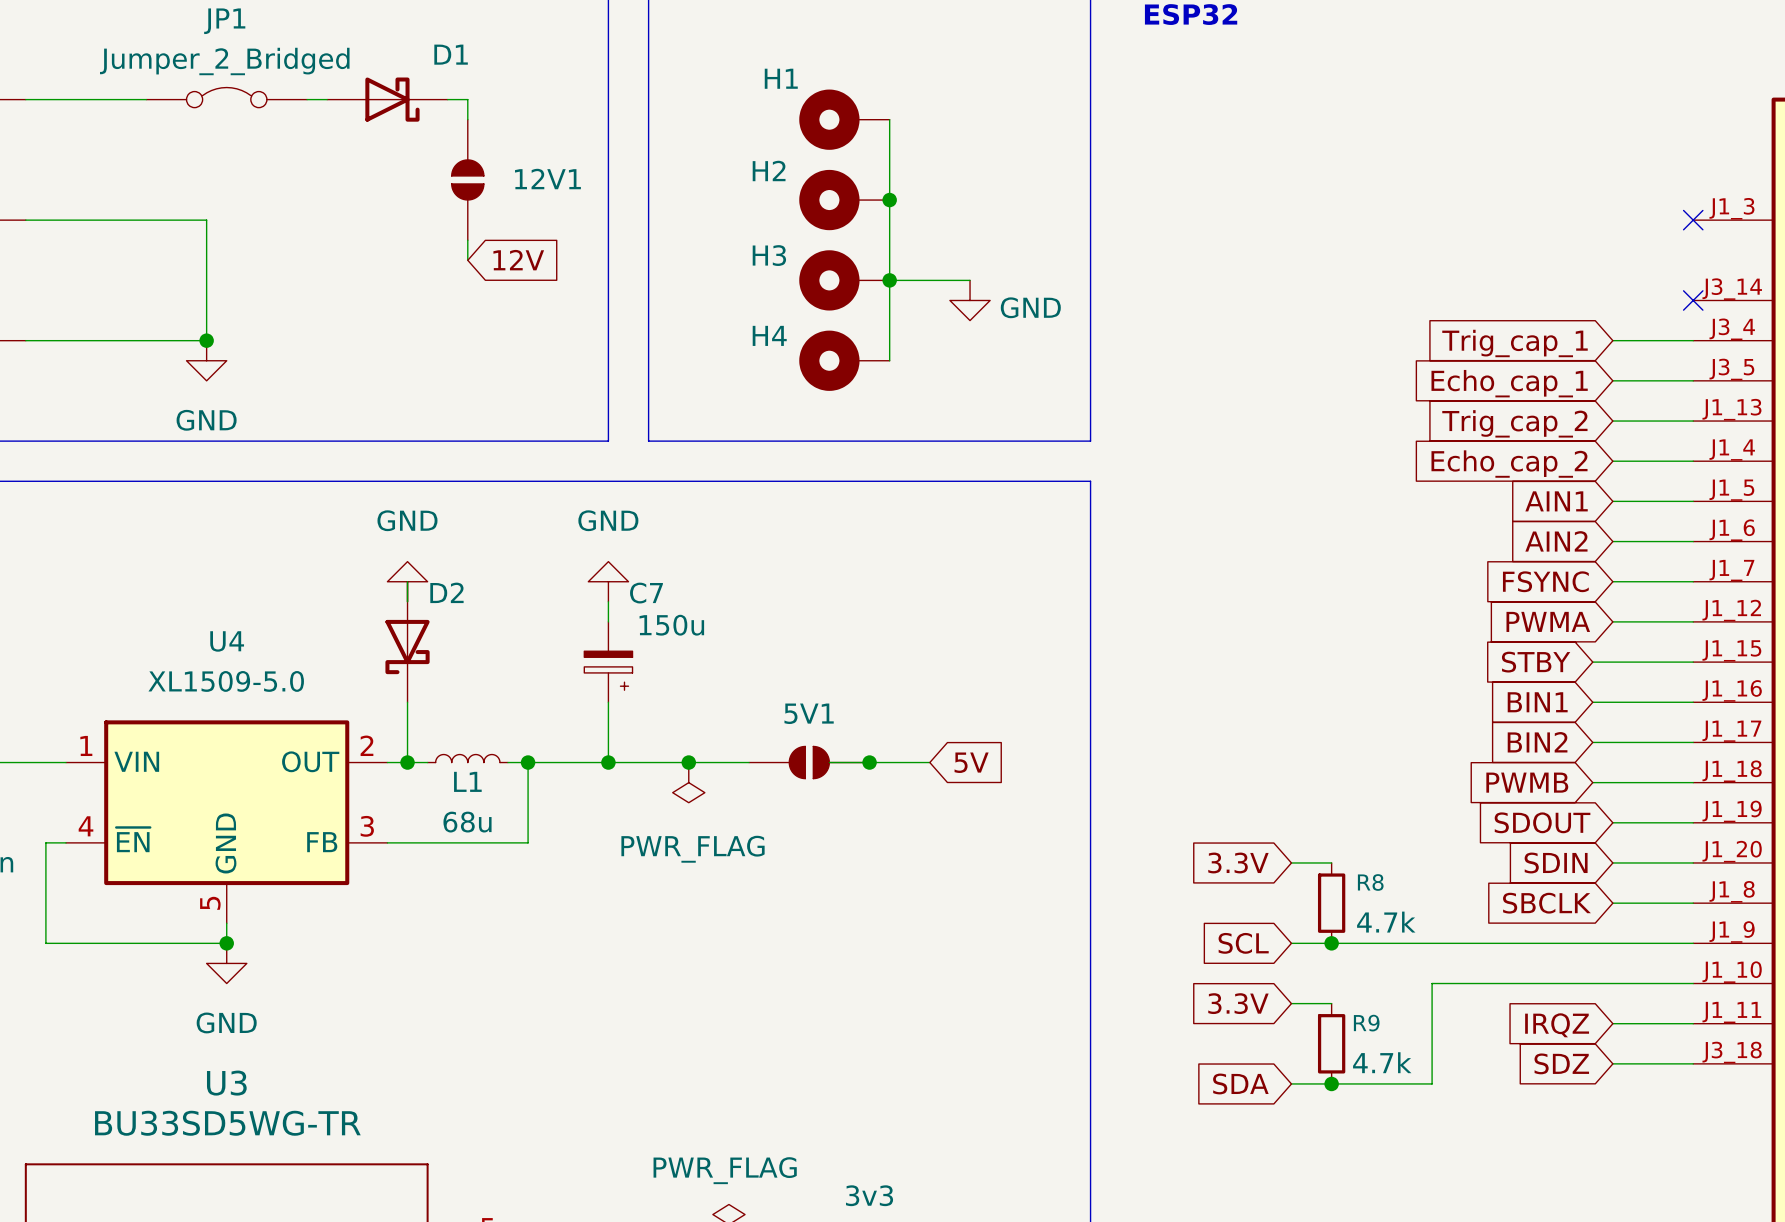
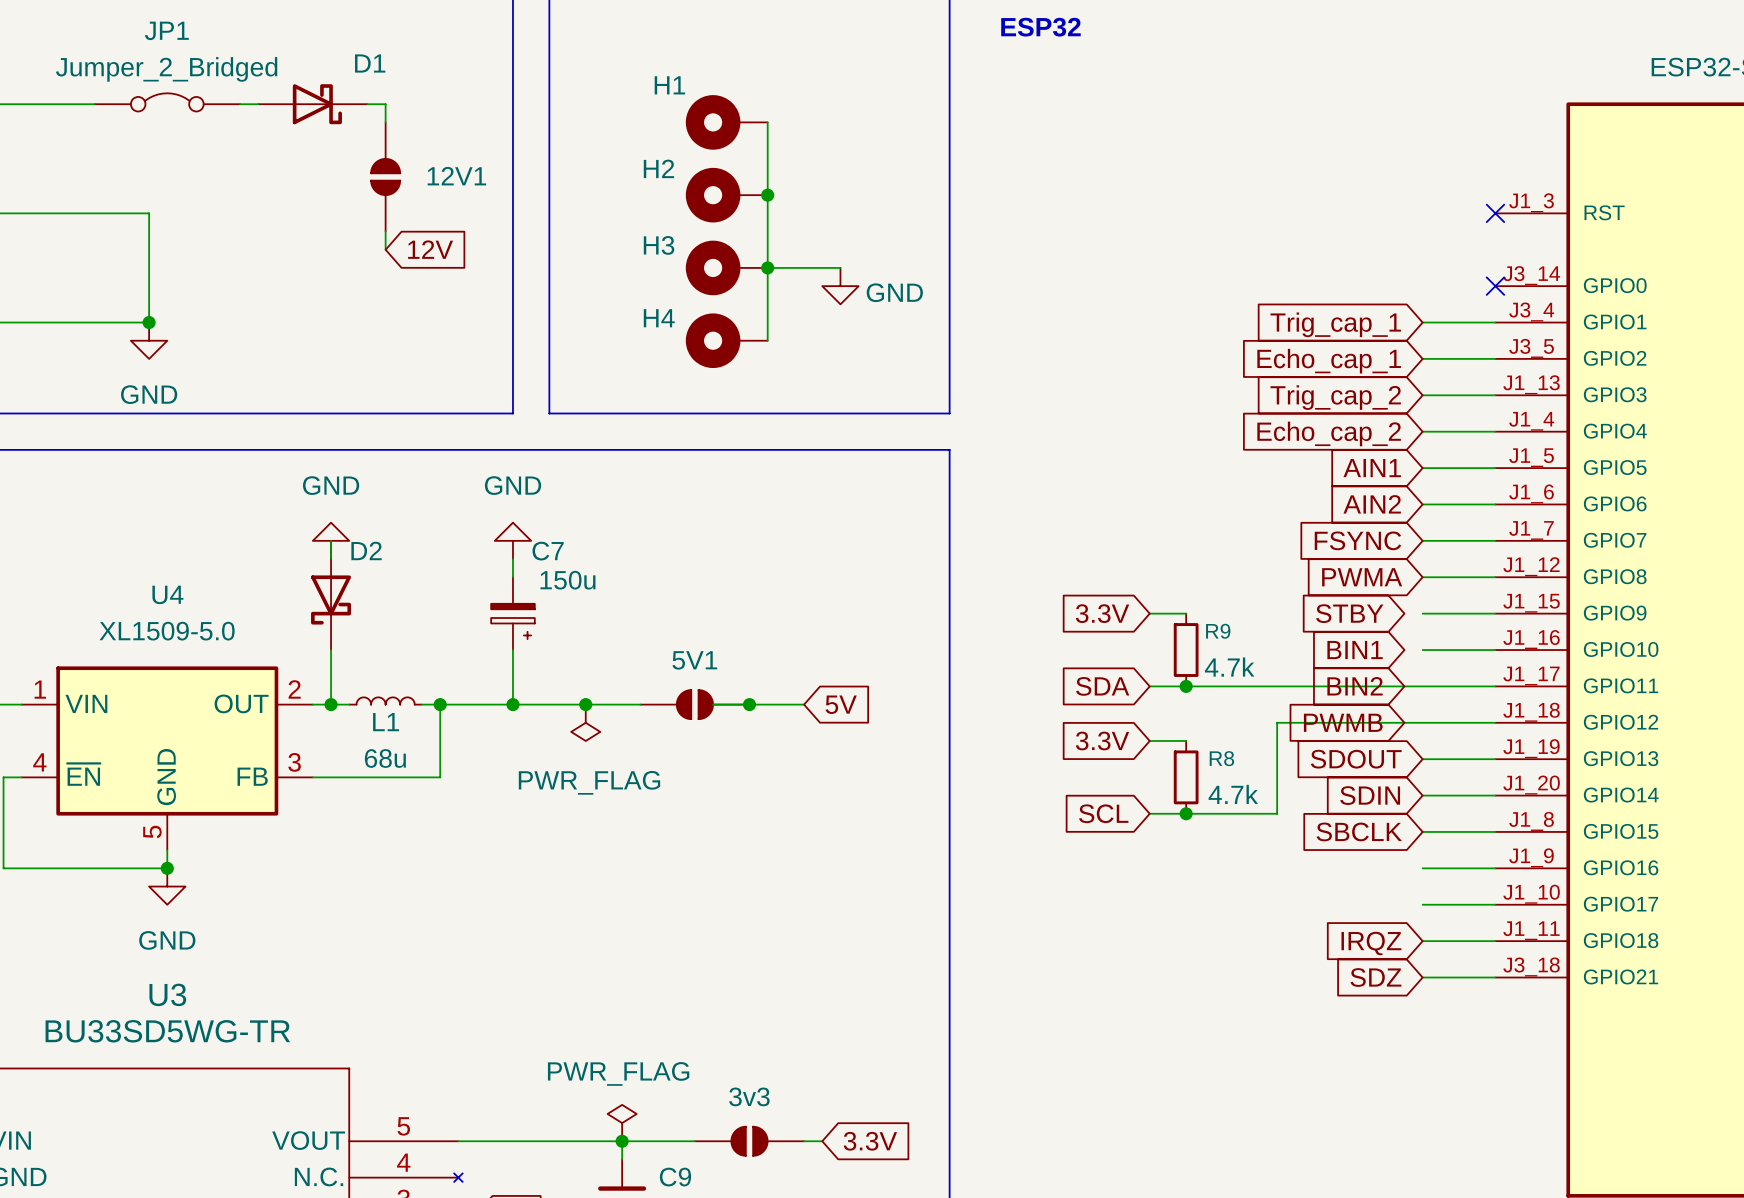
global label: none -> 3.3V (1102, 613)
wire: (1592, 662) (1612, 662) -> none
wire: (1592, 702) (1612, 702) -> none
wire: none -> (1149, 686) (1404, 686)
junction: none -> (1186, 686)
wire: none -> (1404, 722) (1277, 722) (1277, 813) (1149, 813)
wire: (1291, 862) (1331, 862) -> (1149, 613) (1186, 613)
global label position: 3.3V (1238, 863) -> 3.3V (1102, 740)
R8 position: (1331, 903) -> (1186, 777)
global label position: SCL (1243, 943) -> SCL (1103, 813)
wire: (1291, 943) (1612, 943) -> none
junction position: (1331, 943) -> (1186, 813)
wire: (1612, 983) (1432, 983) (1432, 1083) (1291, 1083) -> none
global label: 3.3V (1238, 1003) -> none
wire: (1291, 1003) (1331, 1003) -> (1149, 740) (1186, 740)
R9 position: (1331, 1043) -> (1186, 650)
global label position: SDA (1240, 1083) -> SDA (1102, 686)
junction: (1331, 1083) -> none

